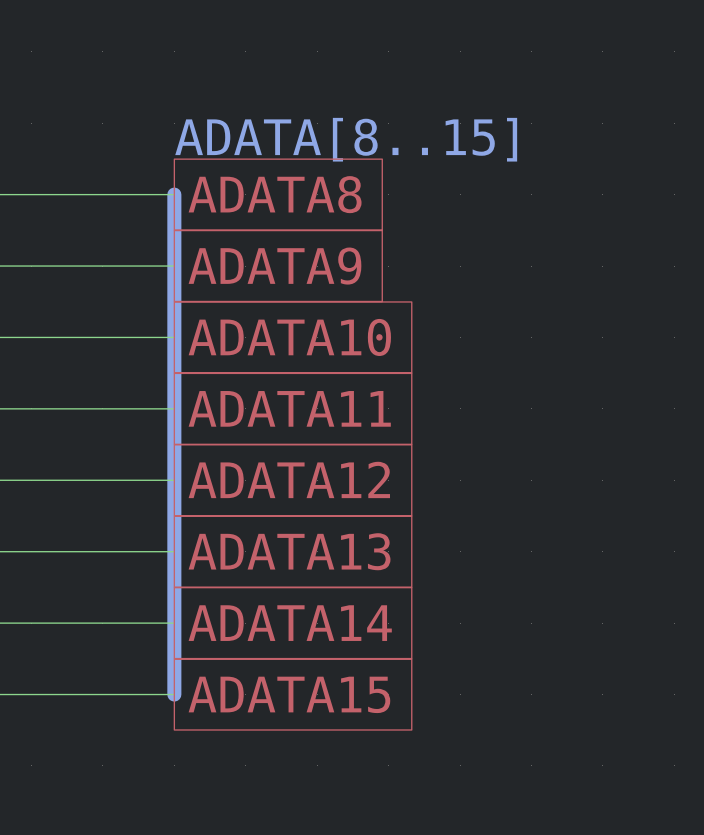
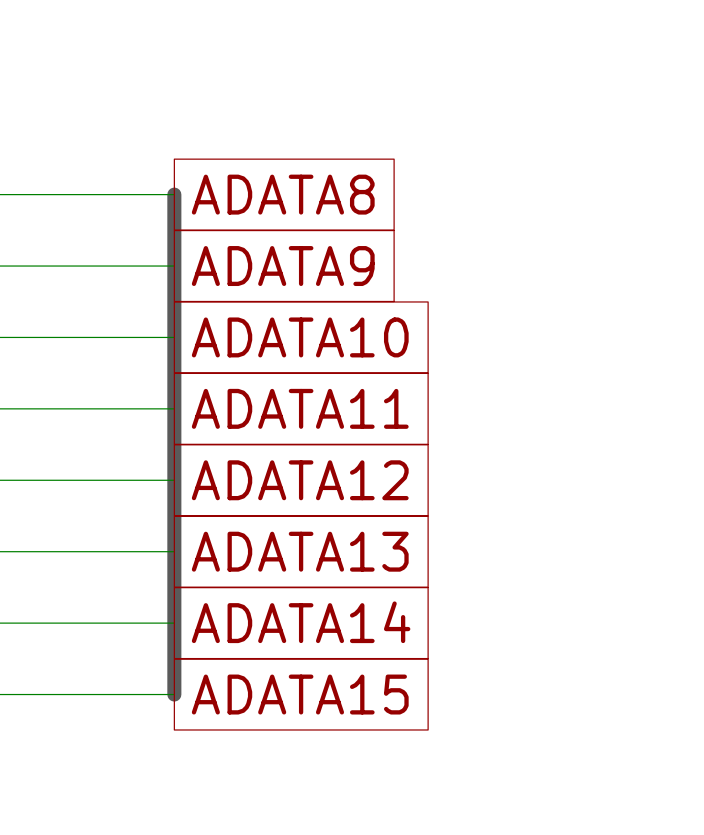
text: ADATA[8..15] (346, 139) -> none

